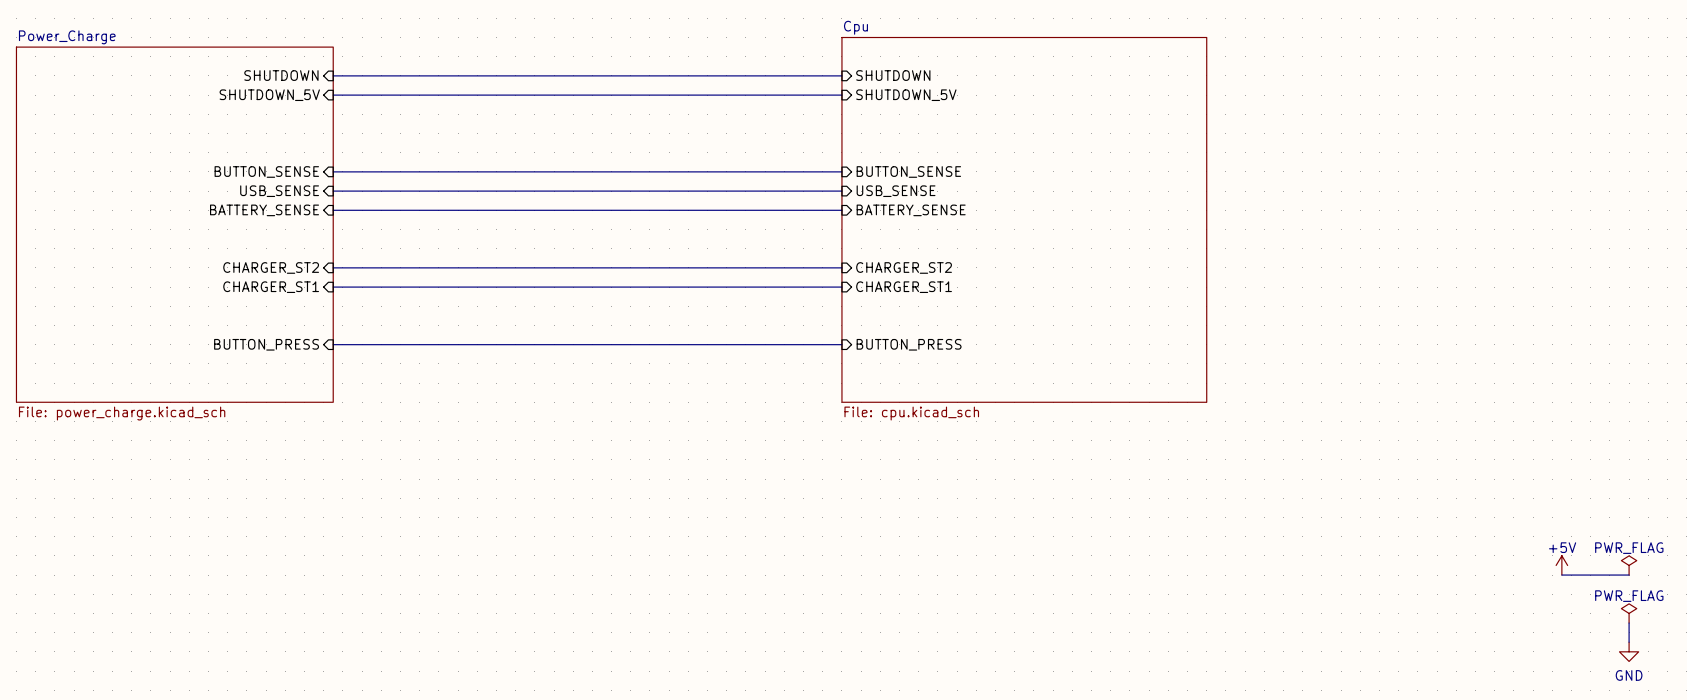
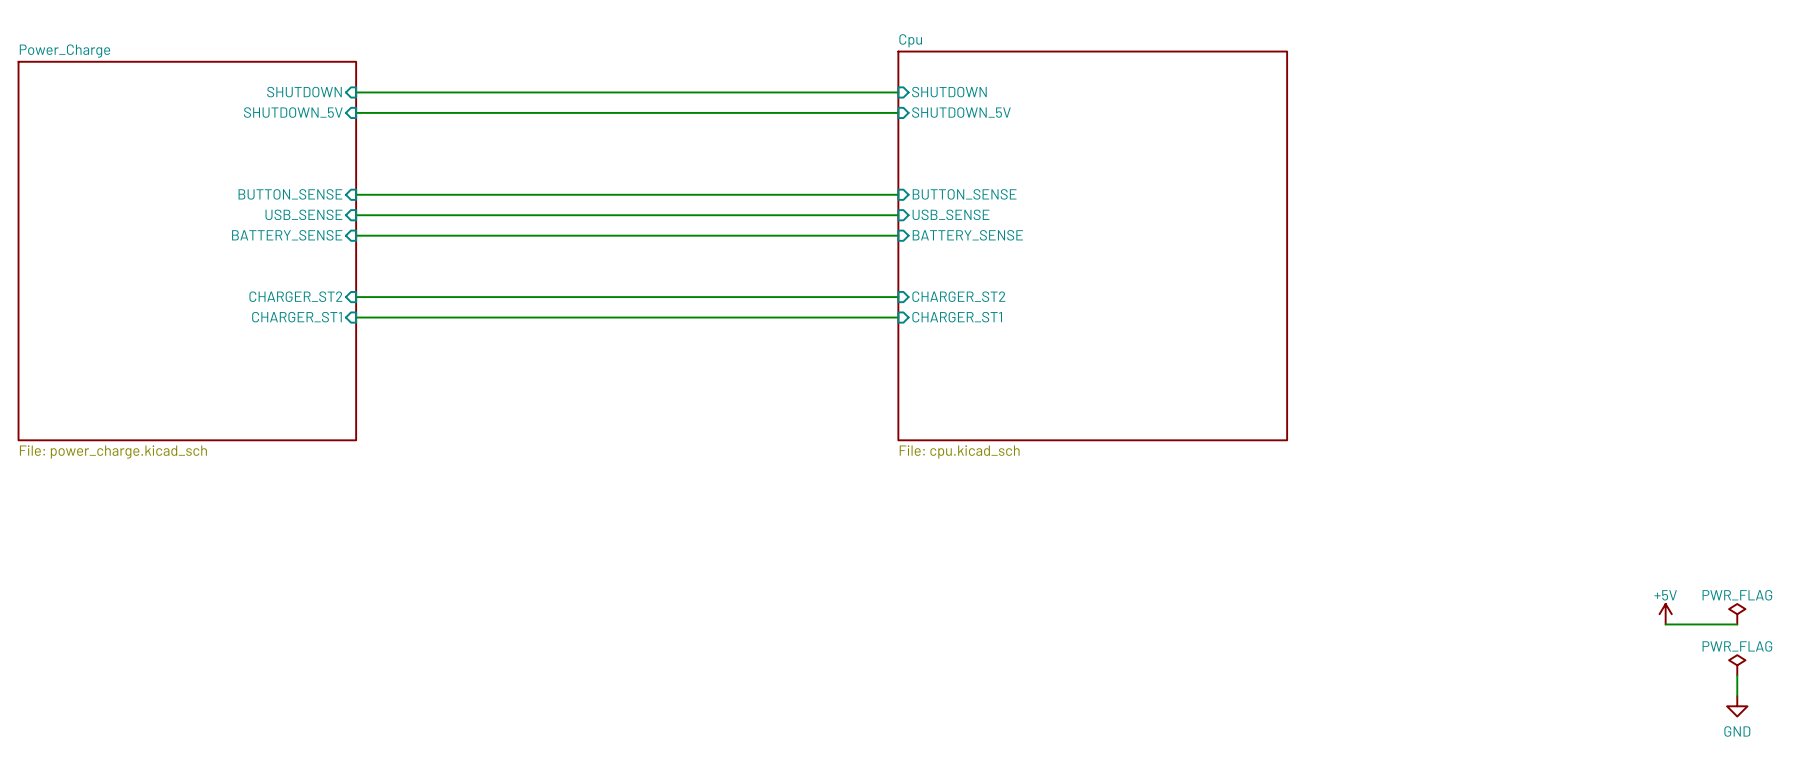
sheet pin: BUTTON_PRESS (266, 344) -> none
wire: (333, 344) (841, 344) -> none
sheet pin: BUTTON_PRESS (909, 344) -> none

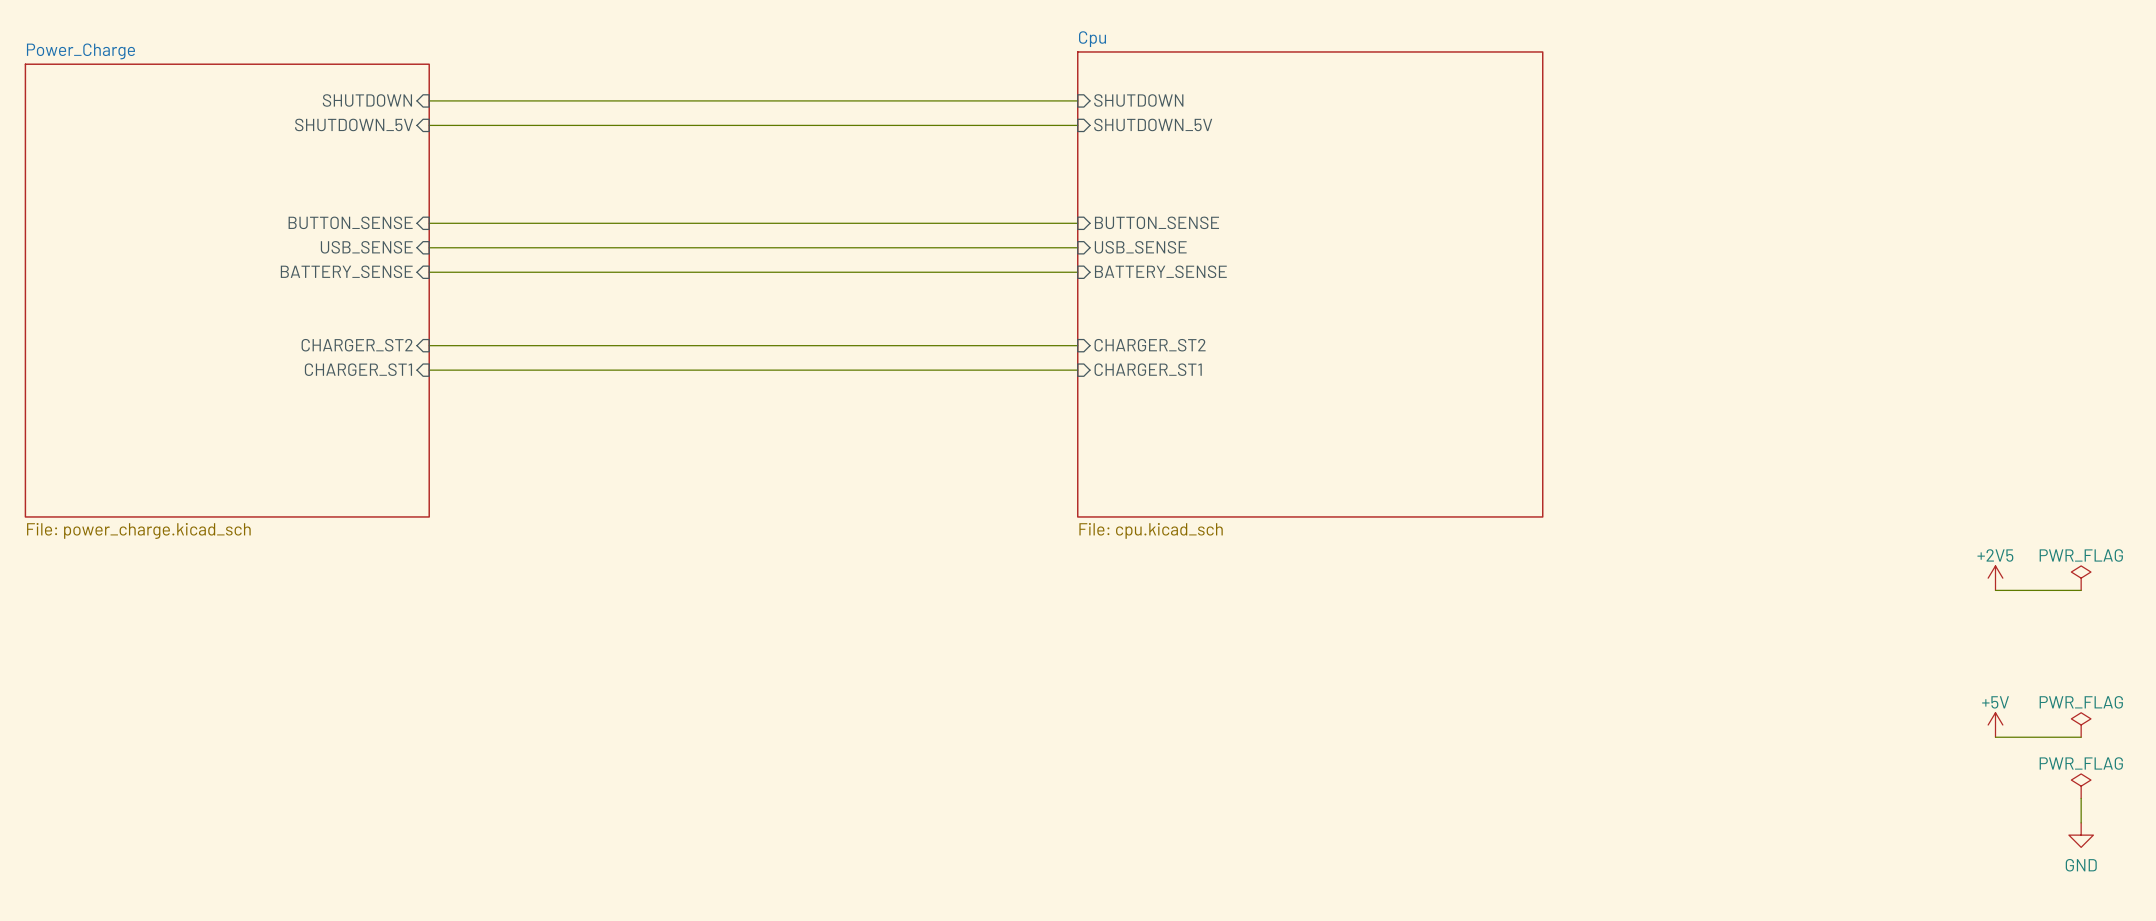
power symbol: none -> +2V5 (1995, 578)
power symbol: none -> PWR_FLAG (2081, 578)
wire: none -> (1995, 590) (2081, 590)

